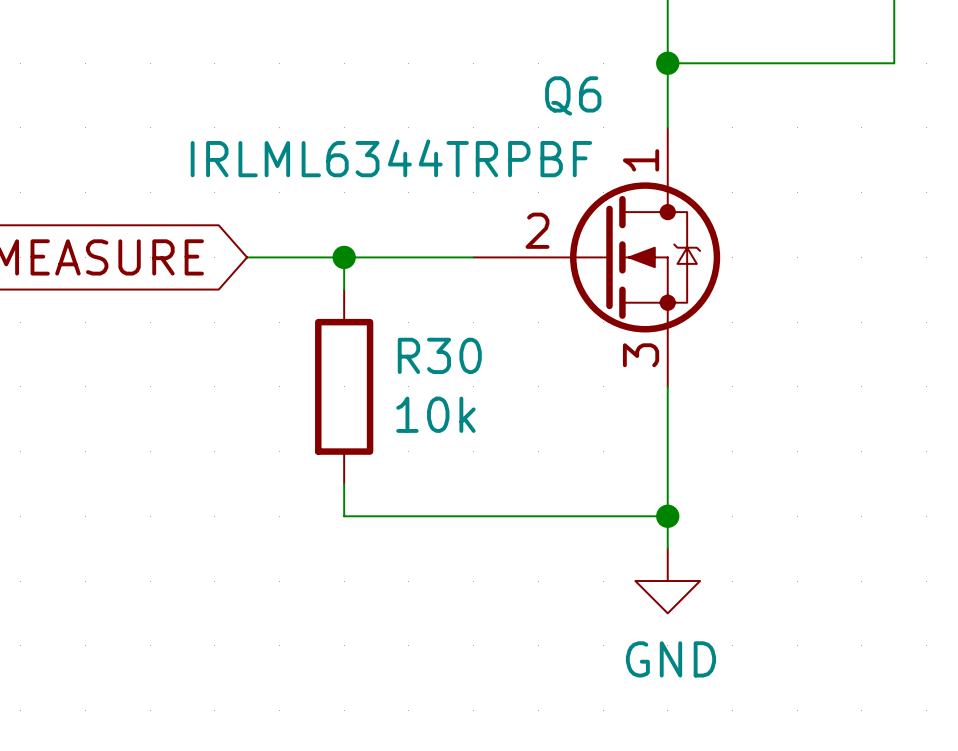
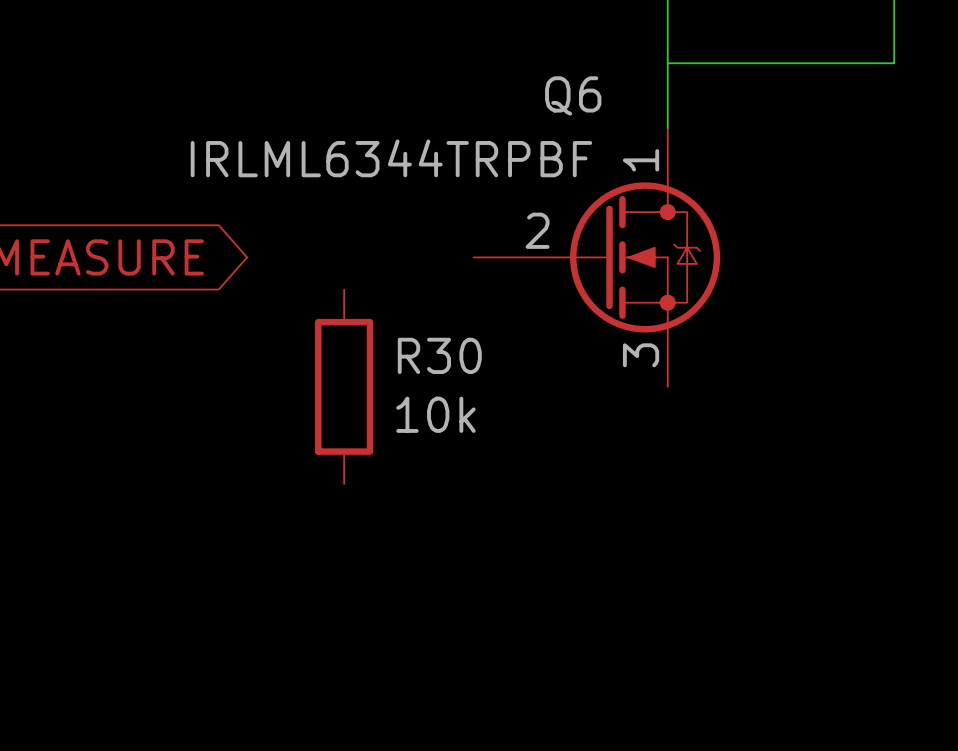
junction: (667, 63) -> none
wire: (247, 257) (473, 257) -> none
wire: (344, 257) (344, 289) -> none
junction: (344, 257) -> none
wire: (667, 386) (667, 548) -> none
wire: (344, 483) (344, 516) (667, 516) -> none
junction: (667, 516) -> none
power symbol: GND (667, 581) -> none

